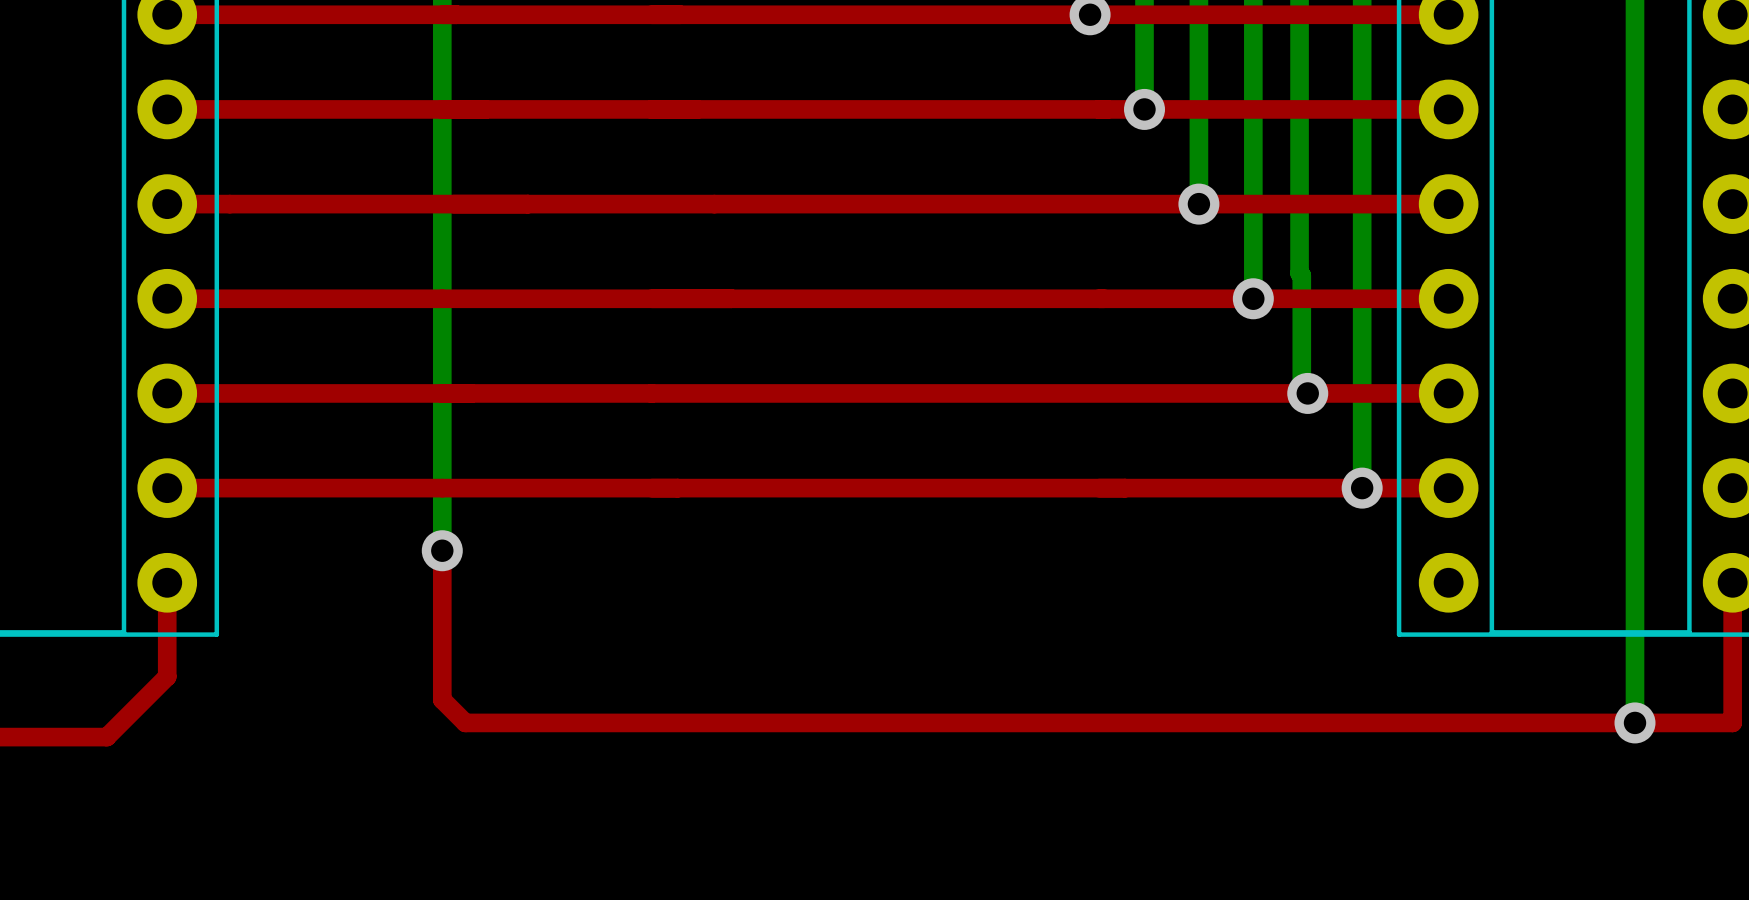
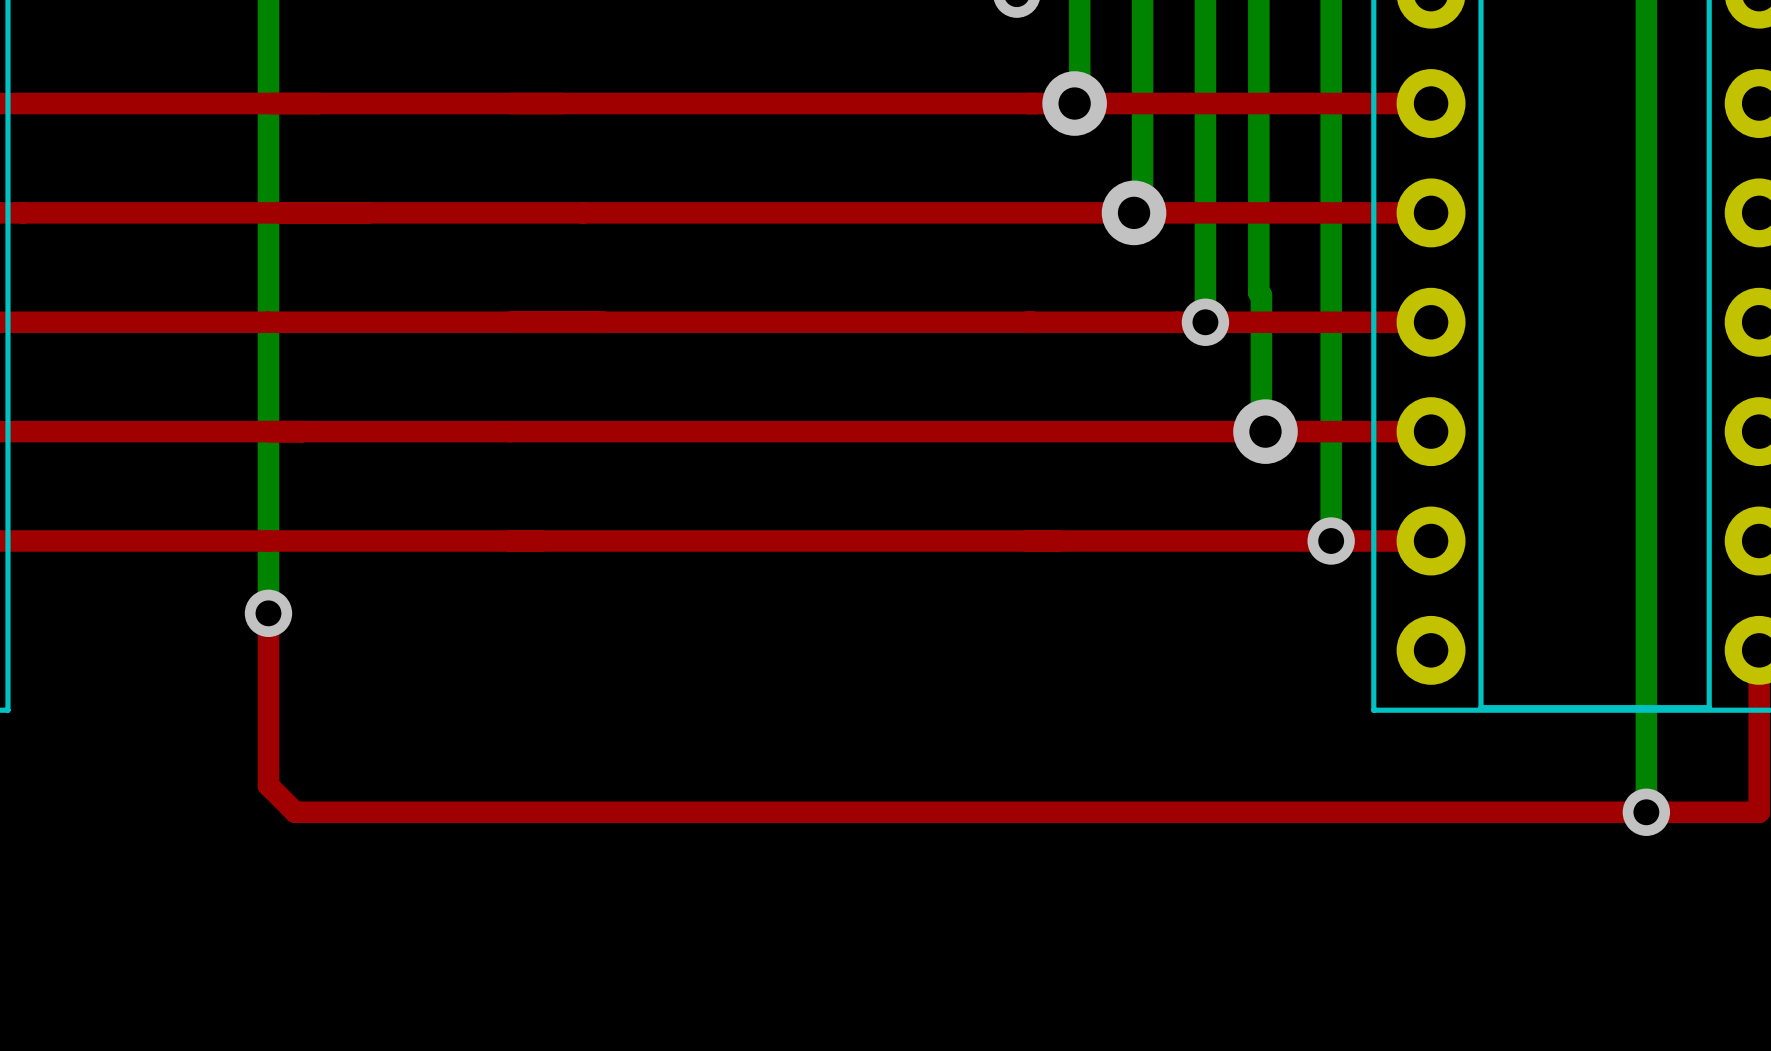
via size: [1124, 88, 1166, 130] -> [1042, 71, 1107, 136]
via size: [1178, 183, 1220, 225] -> [1101, 180, 1167, 246]
via size: [1287, 372, 1329, 414] -> [1233, 399, 1298, 464]

